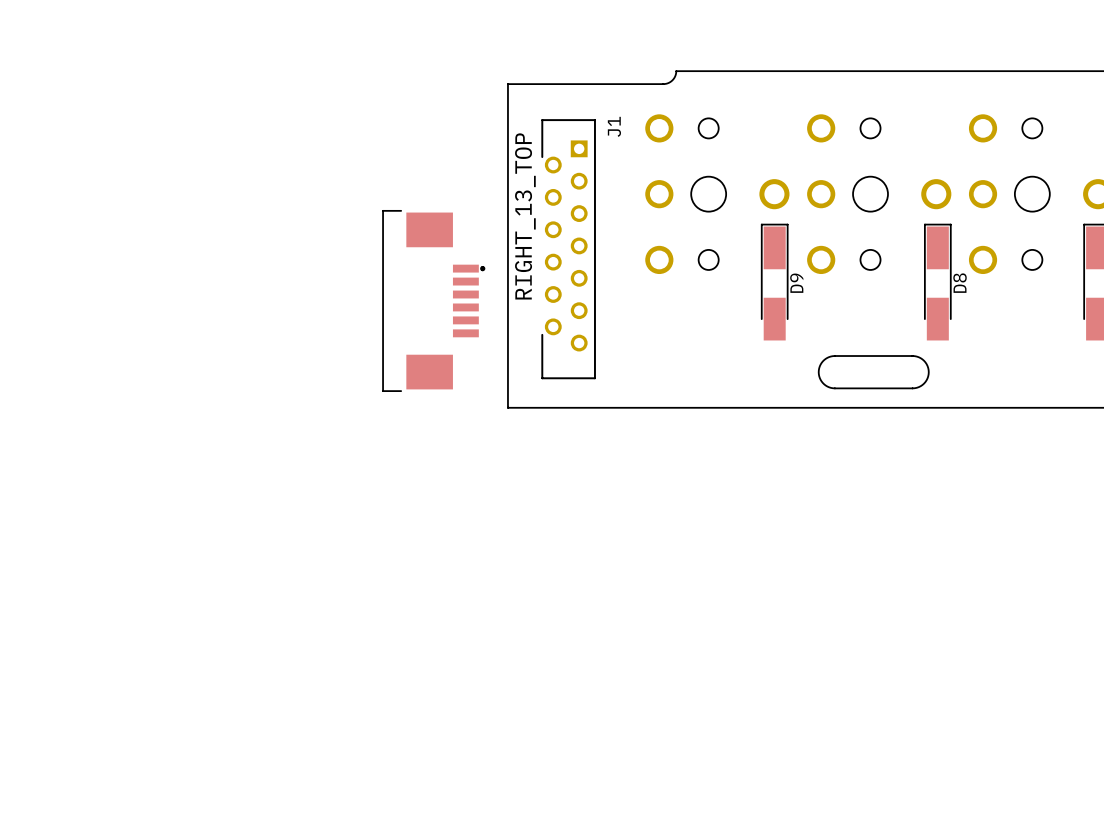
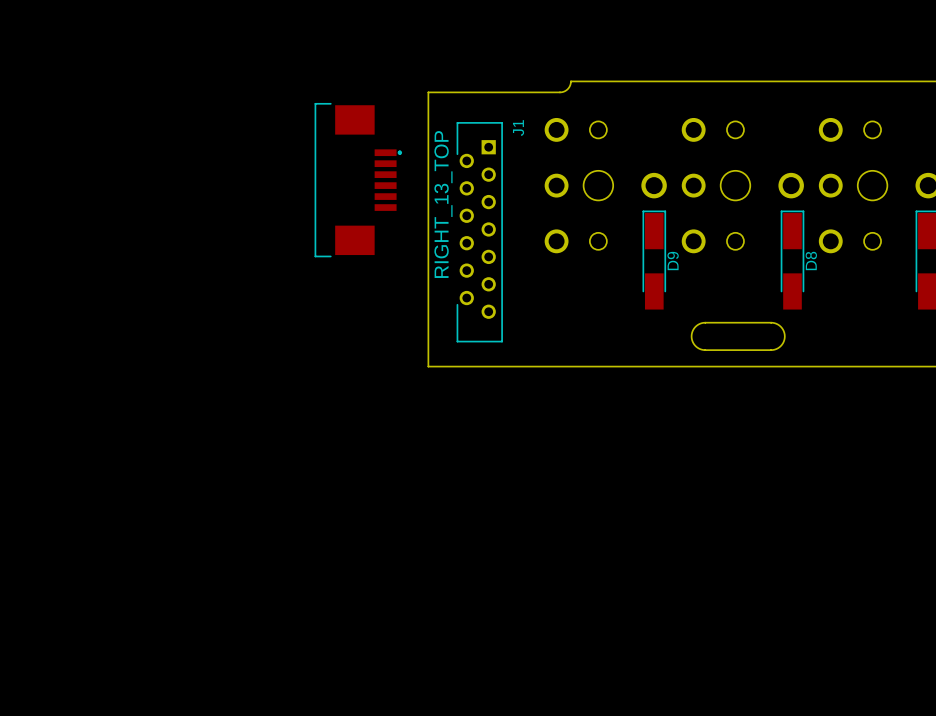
part position: (433, 300) -> (358, 180)

